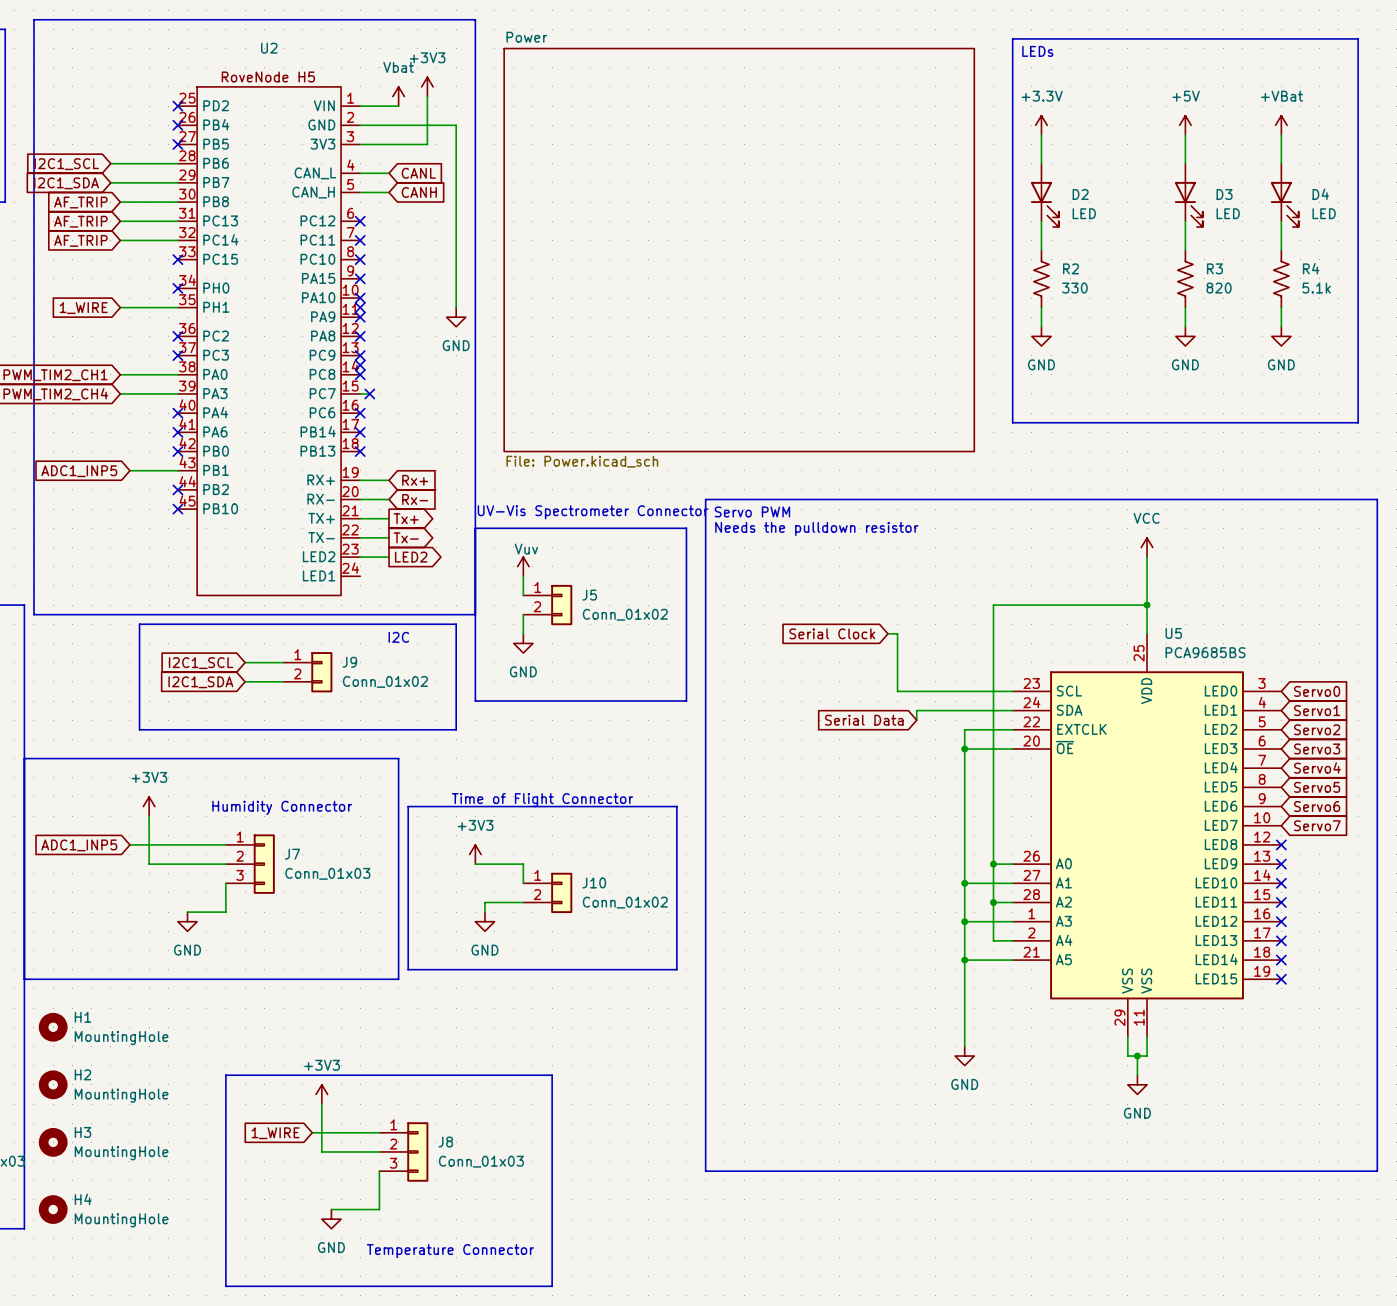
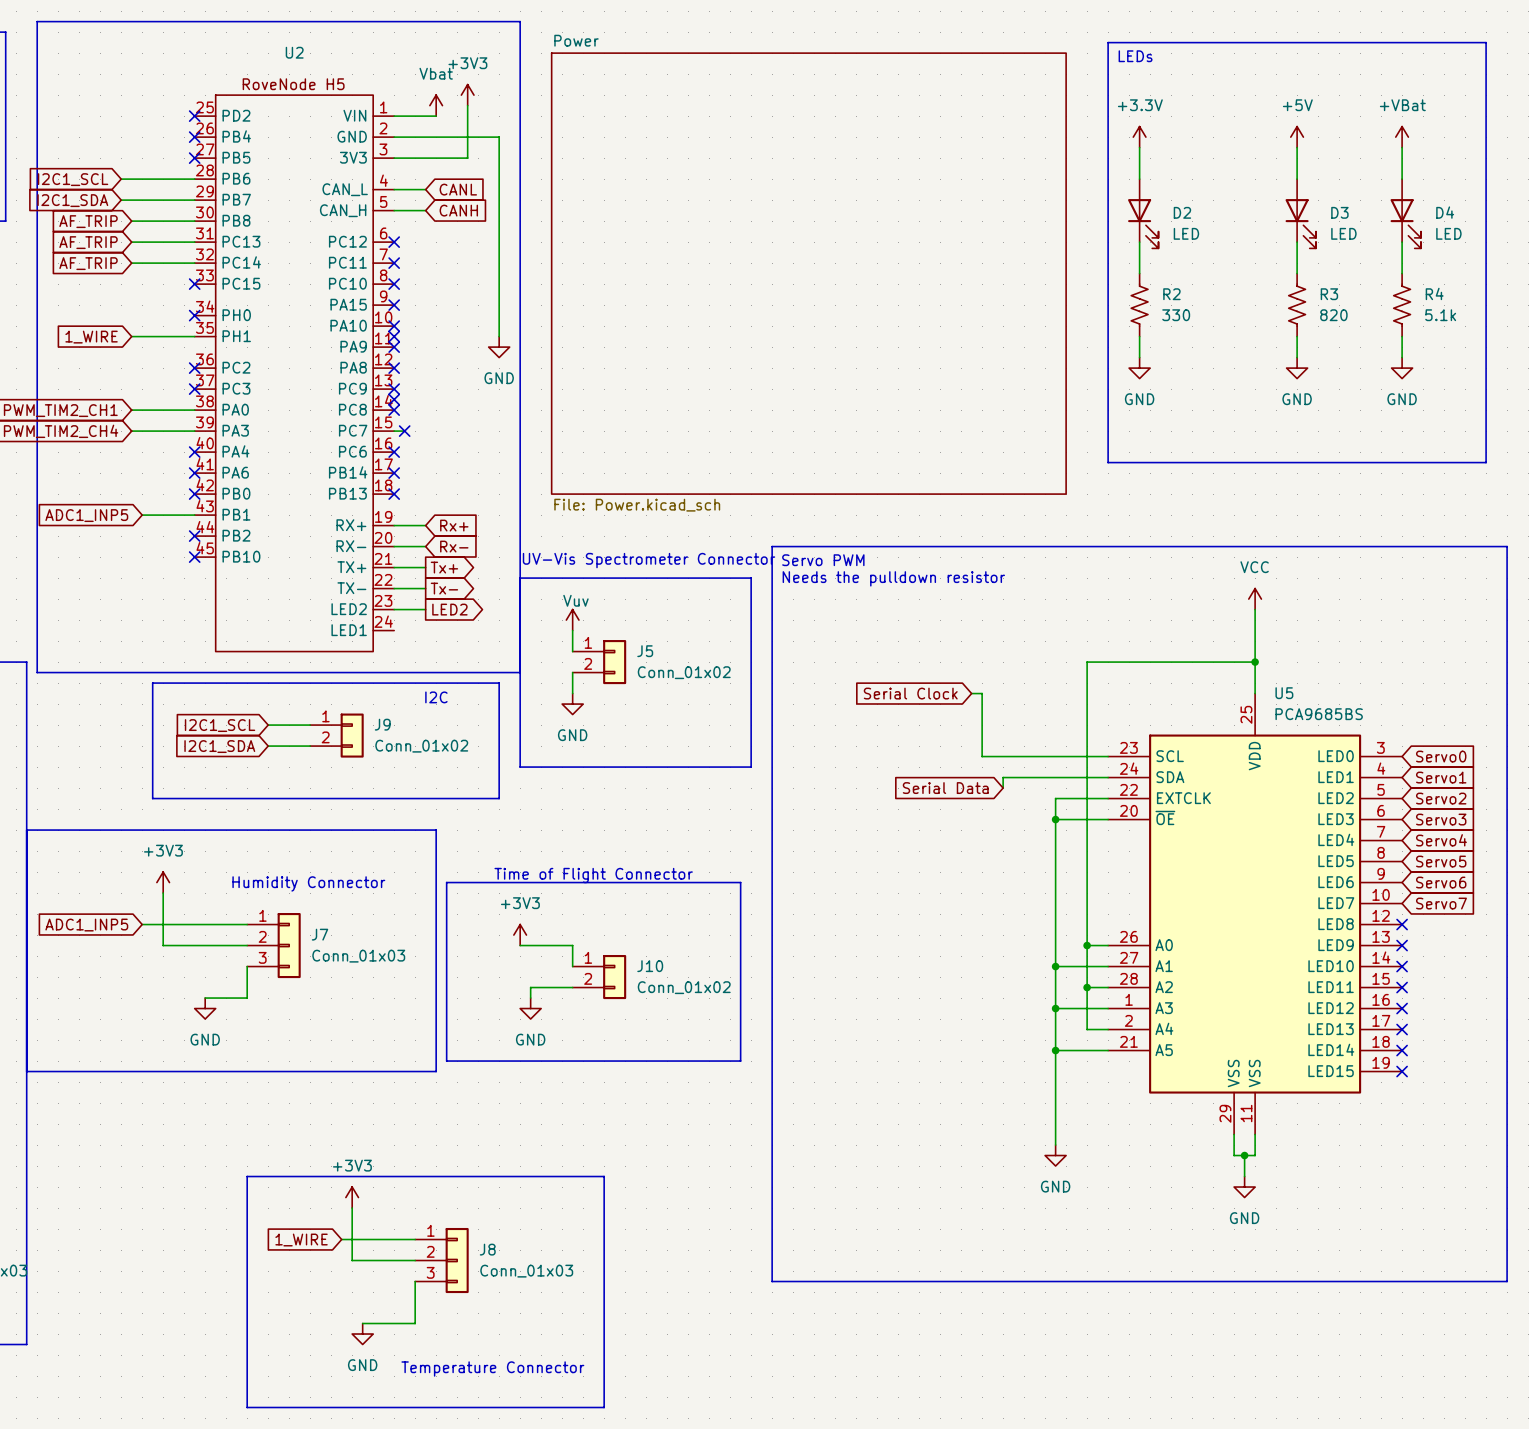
H1: MountingHole (53, 1027) -> none
H2: MountingHole (53, 1084) -> none
H3: MountingHole (53, 1142) -> none
H4: MountingHole (53, 1209) -> none

